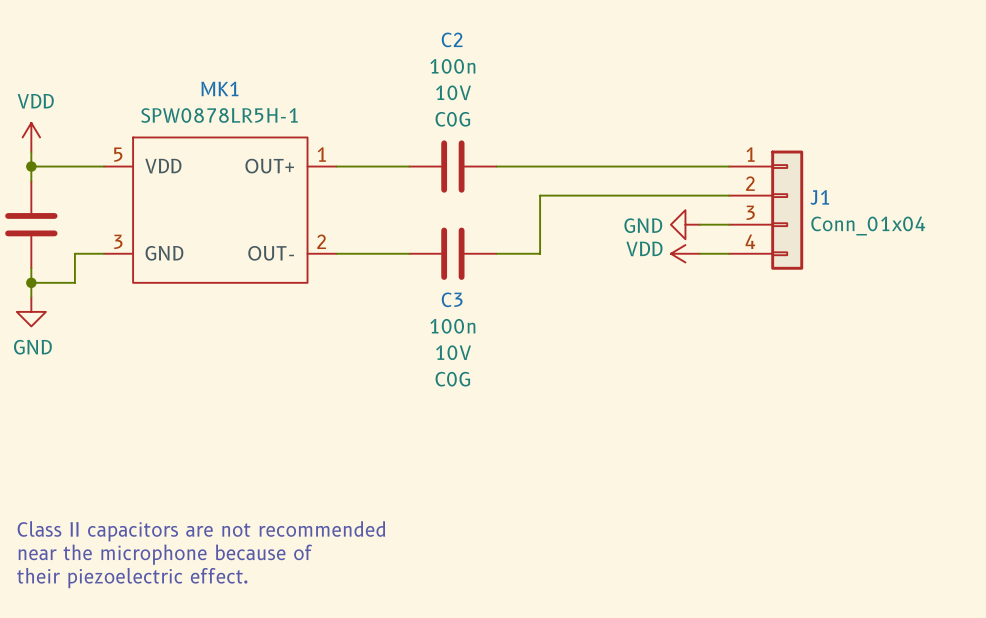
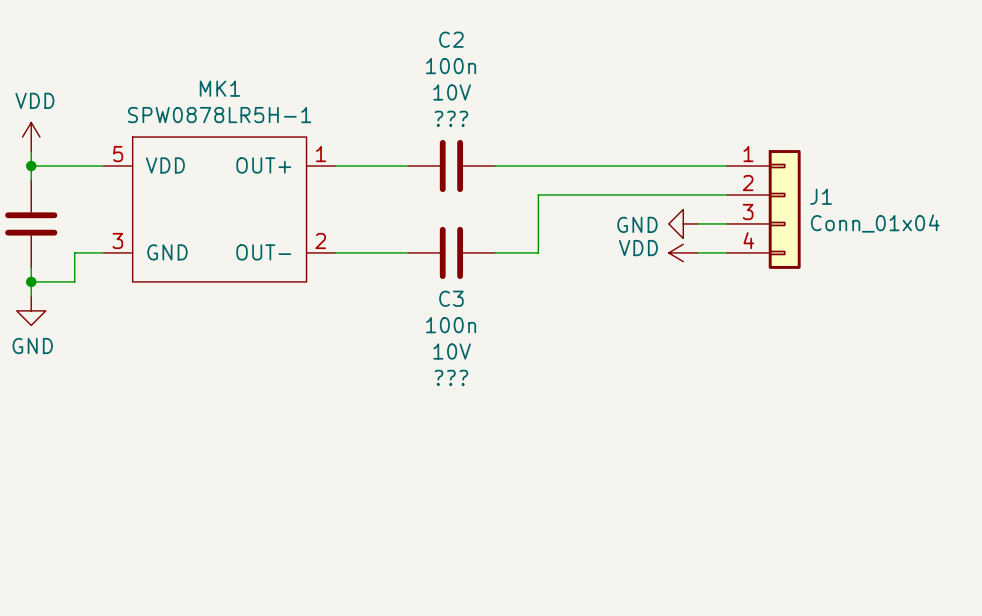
C2 text: C0G (452, 119) -> ??? (451, 118)
C3 text: C0G (452, 379) -> ??? (451, 377)
text: Class II capacitors are not recommended (201, 531) -> none
text: near the microphone because of (165, 554) -> none
text: their piezoelectric effect. (132, 578) -> none

